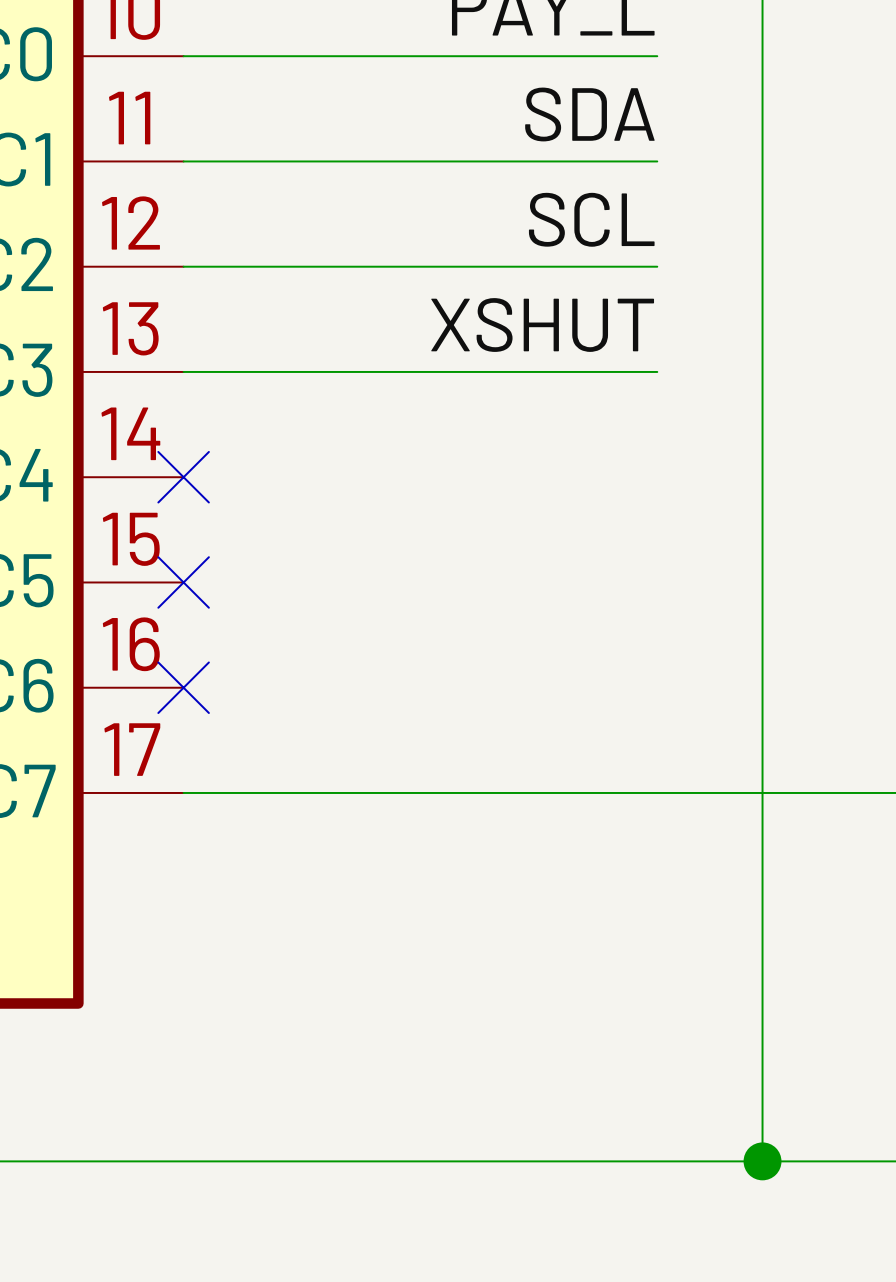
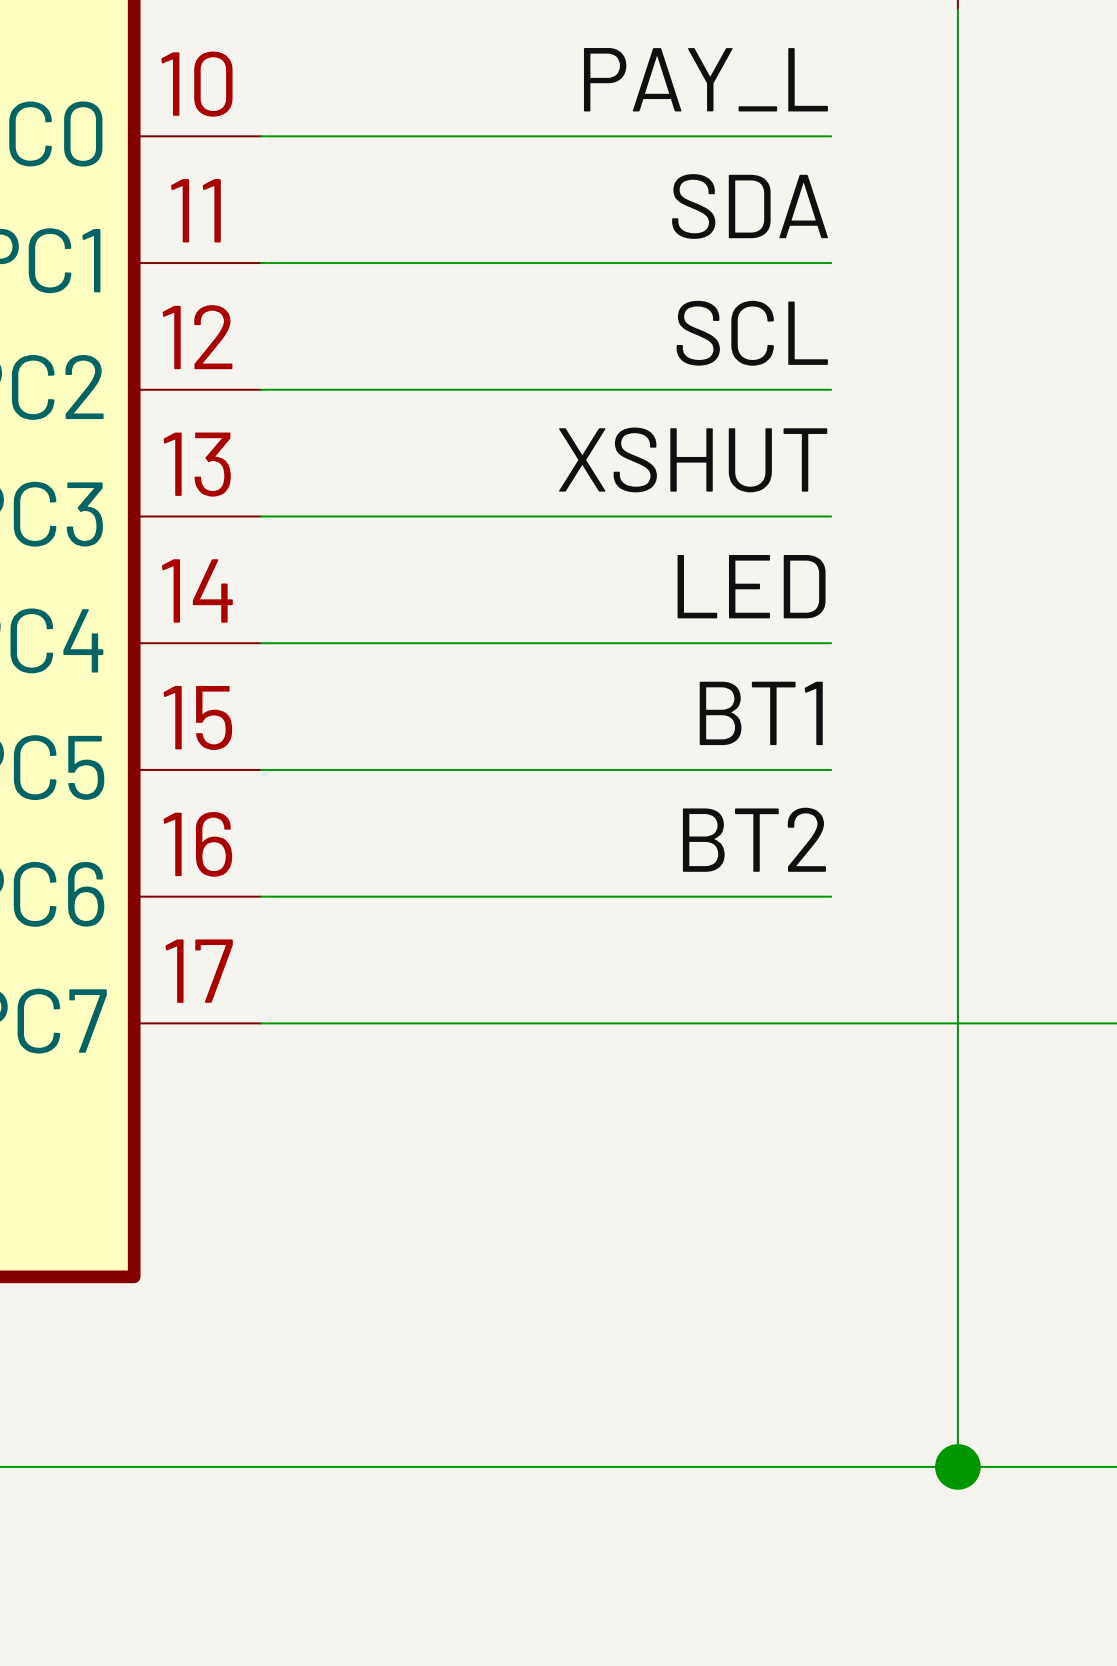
label: none -> LED (751, 586)
wire: none -> (260, 643) (831, 643)
no-connect mark: (183, 477) -> none
label: none -> BT1 (761, 713)
wire: none -> (260, 769) (831, 769)
no-connect mark: (183, 582) -> none
label: none -> BT2 (754, 839)
wire: none -> (260, 896) (831, 896)
no-connect mark: (183, 687) -> none

